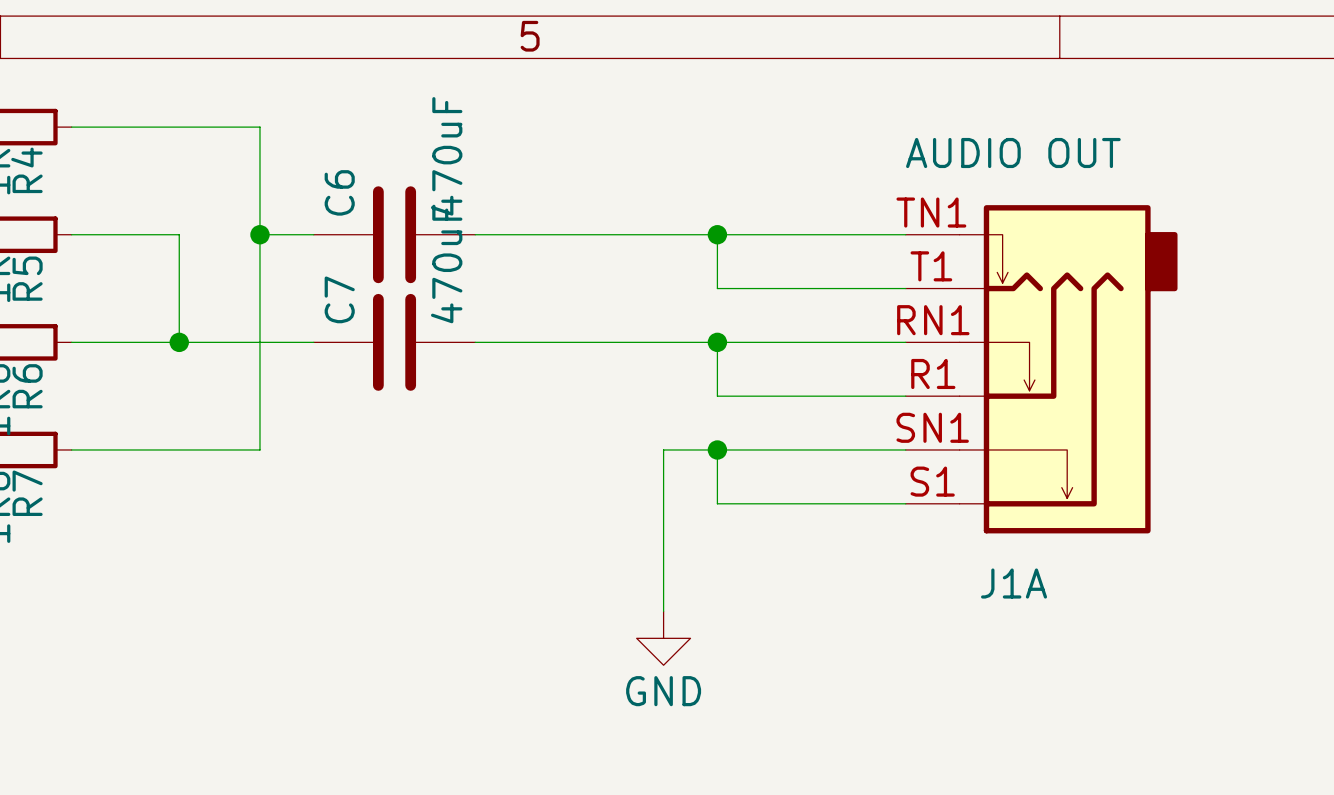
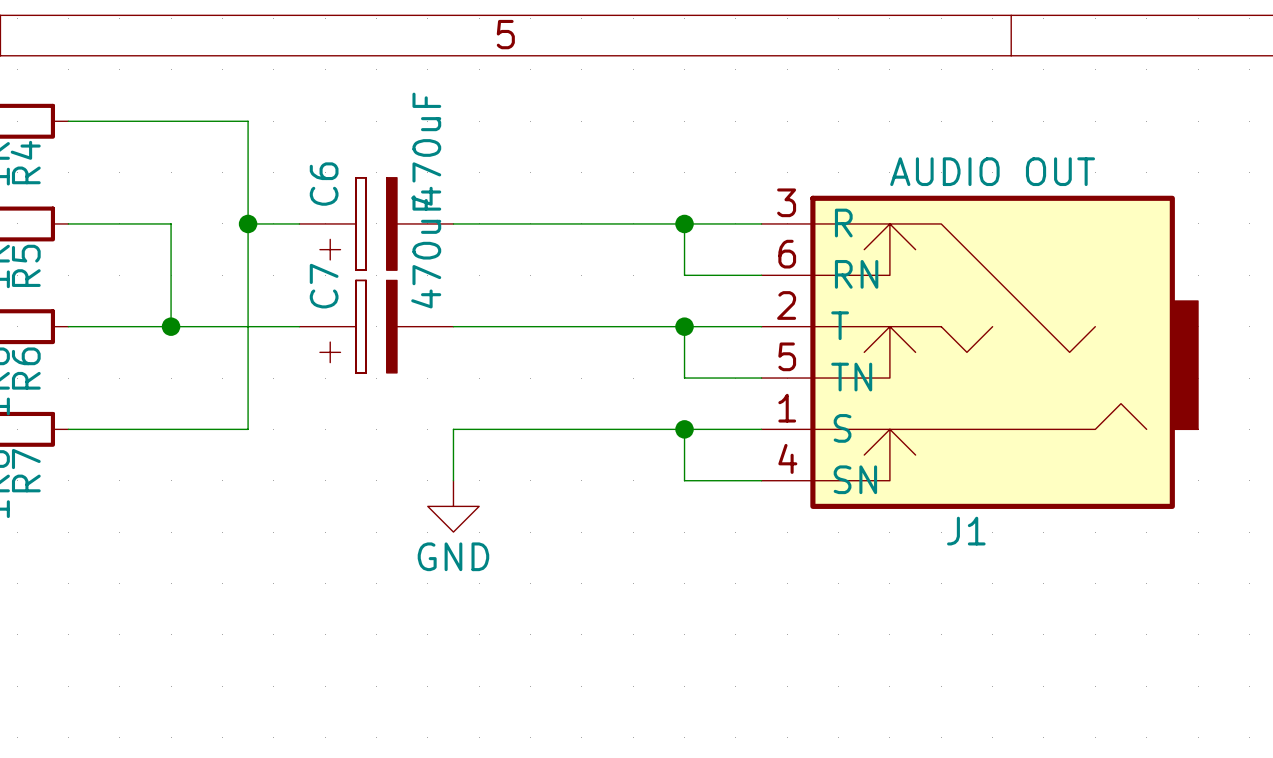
C6 symbol: [313, 186, 476, 284] -> [299, 177, 454, 271]
C7 symbol: [313, 293, 476, 391] -> [299, 280, 454, 373]
J1: none -> AUDIO OUT (979, 352)
J1A: AUDIO OUT (1041, 369) -> none
wire: (663, 449) (663, 611) -> (633, 429) (453, 429) (453, 480)
power symbol position: GND (663, 638) -> GND (453, 506)

